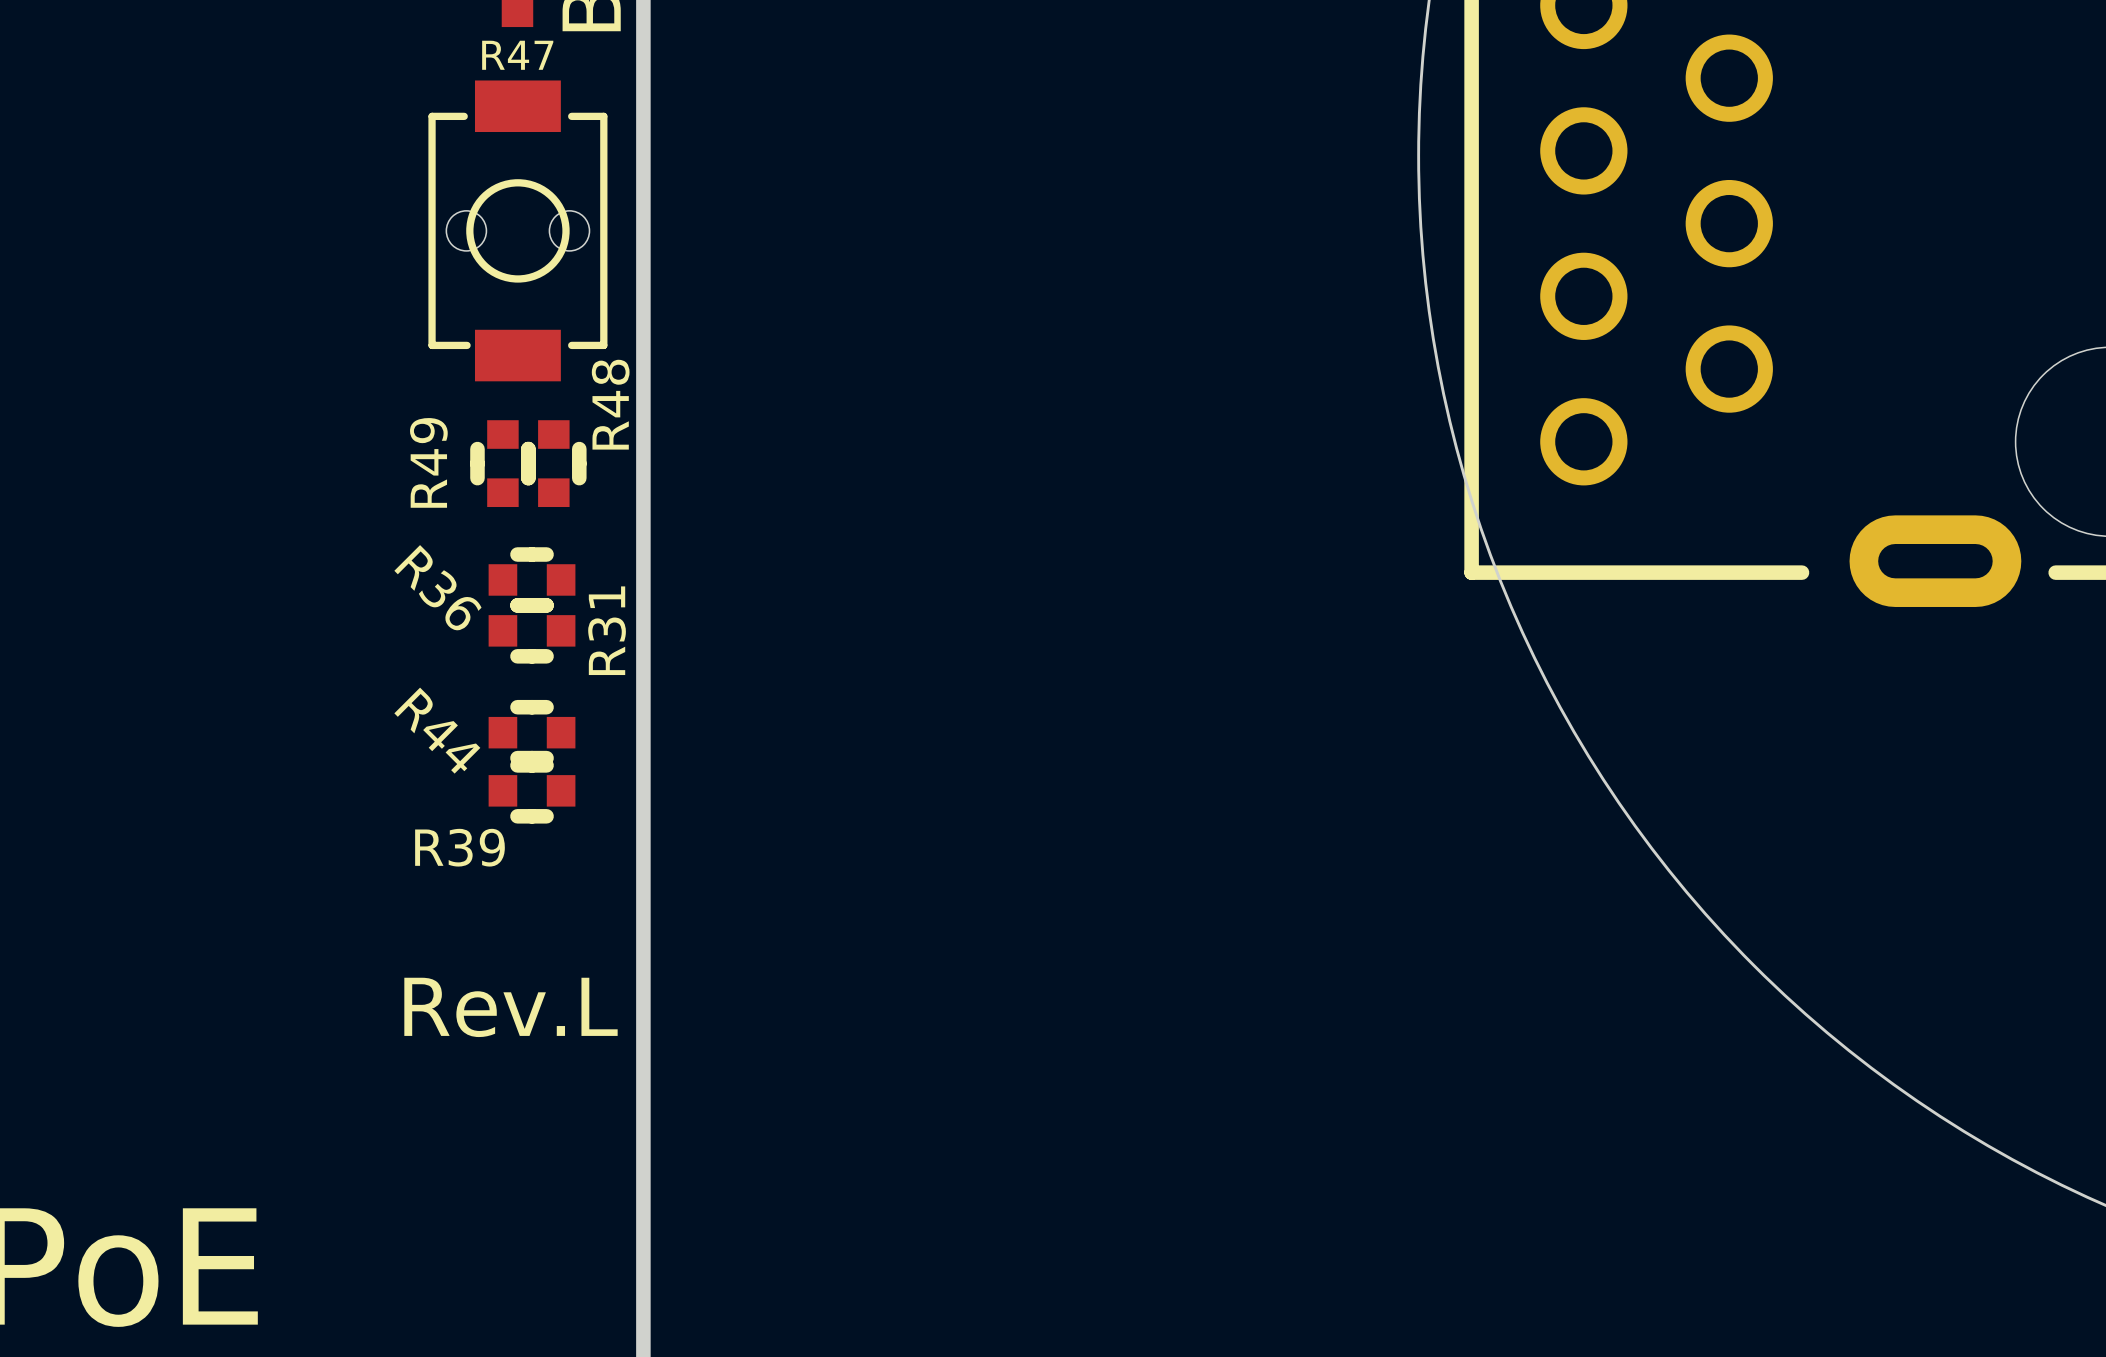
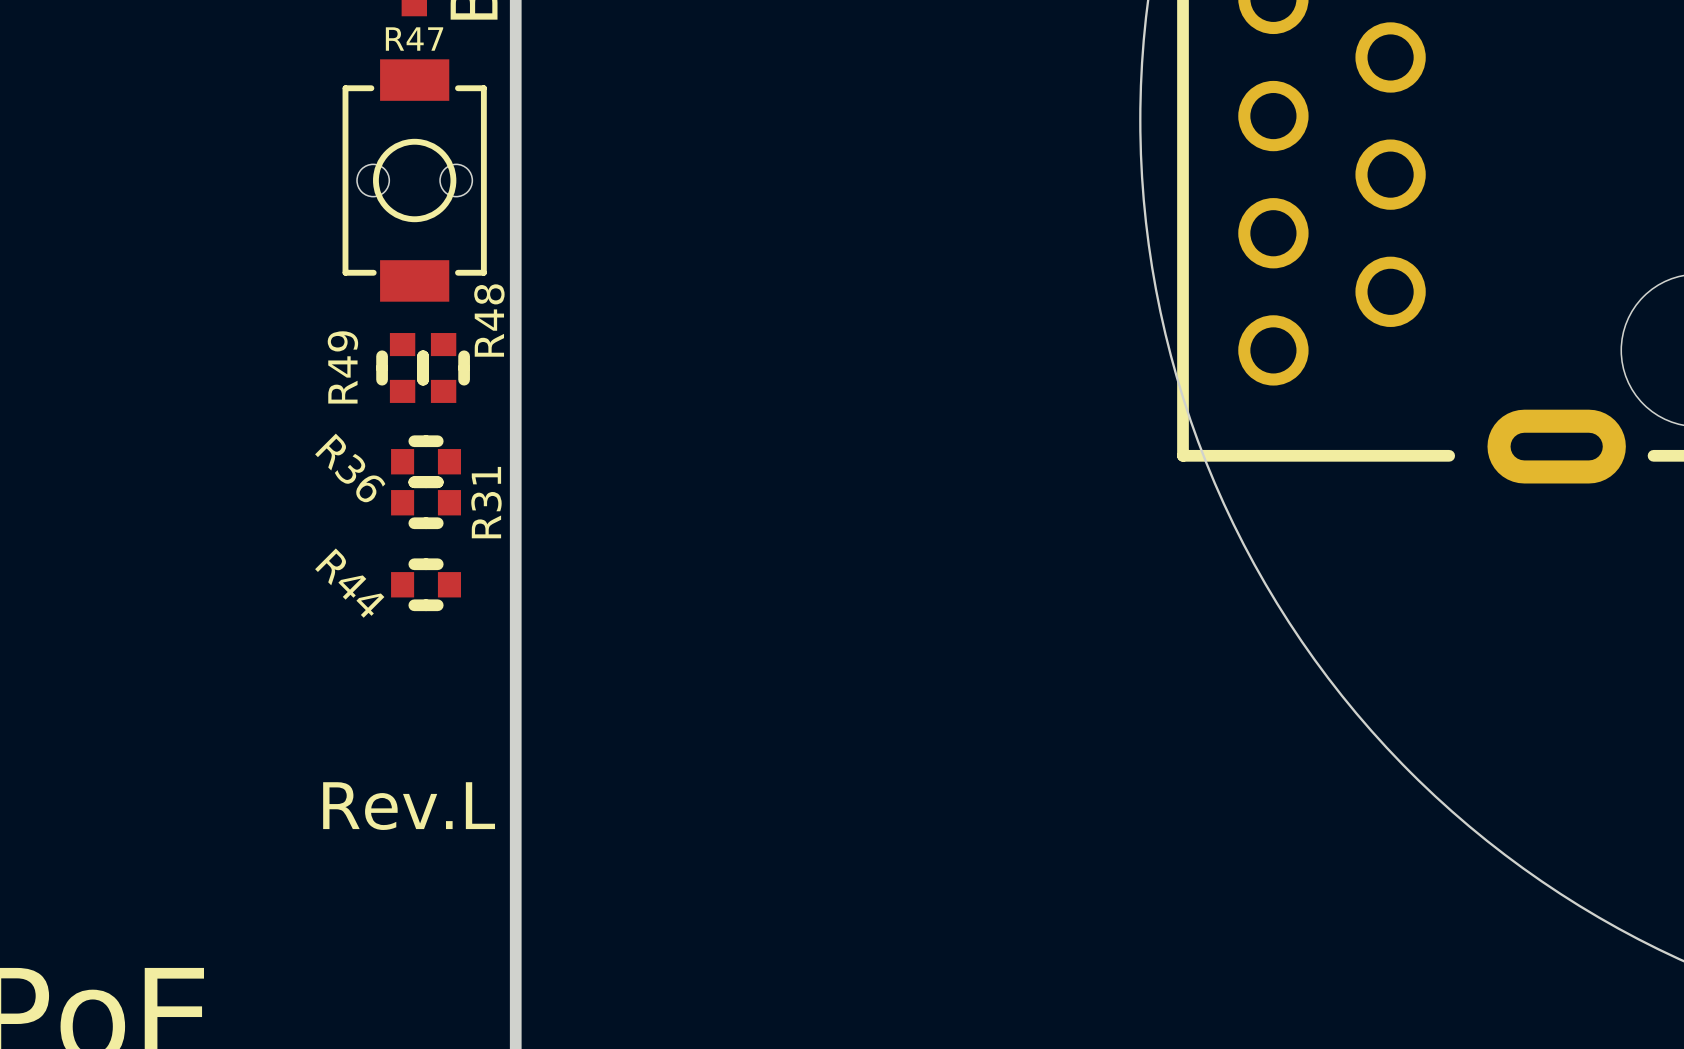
R39: (532, 790) -> none

